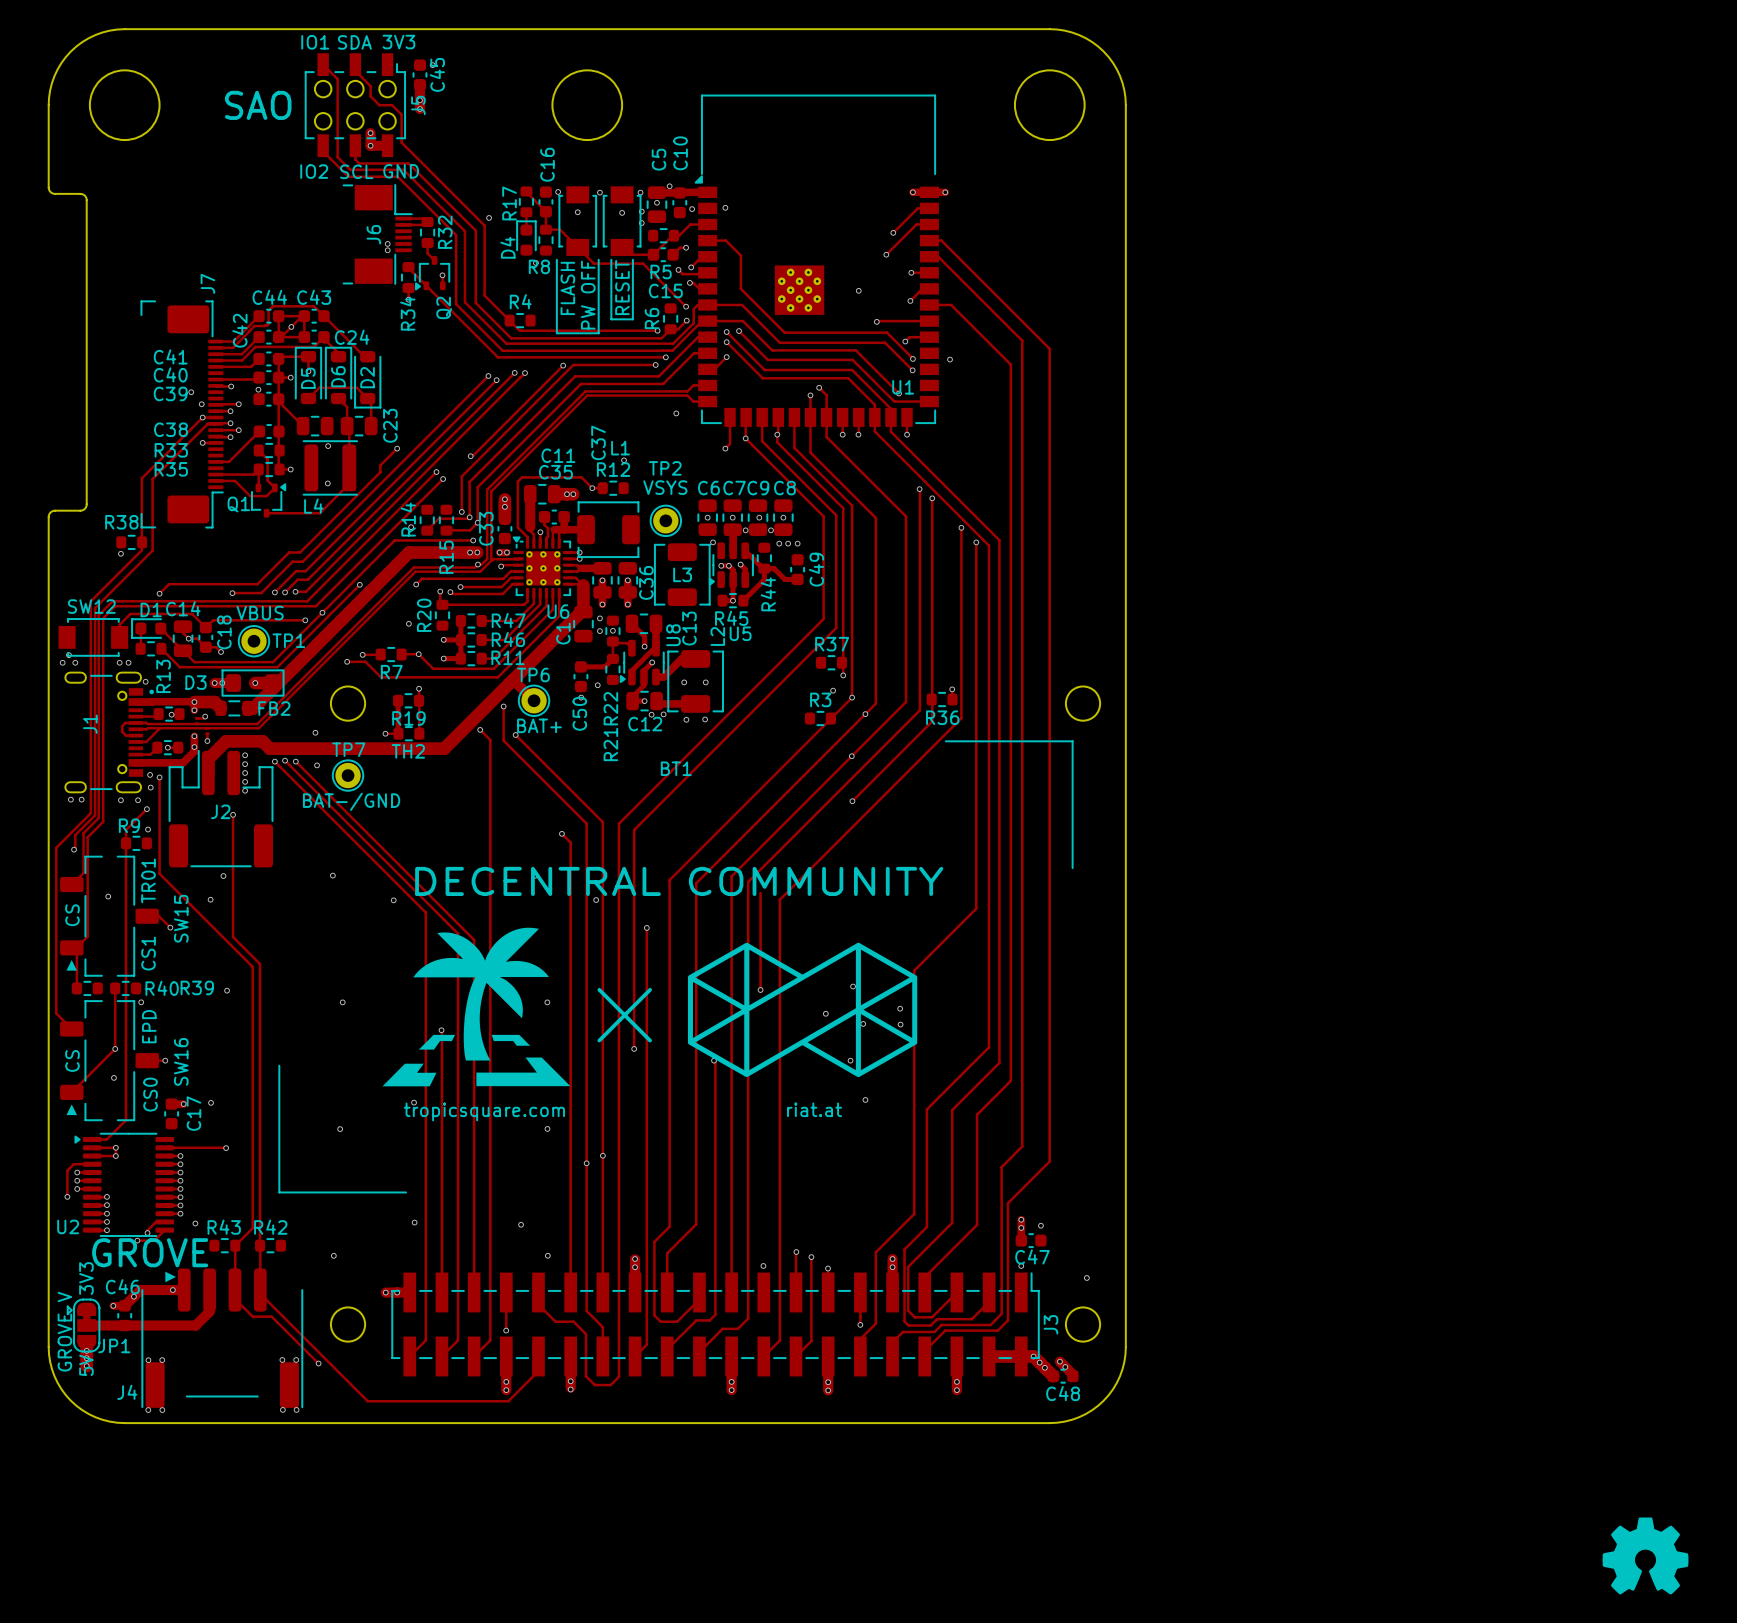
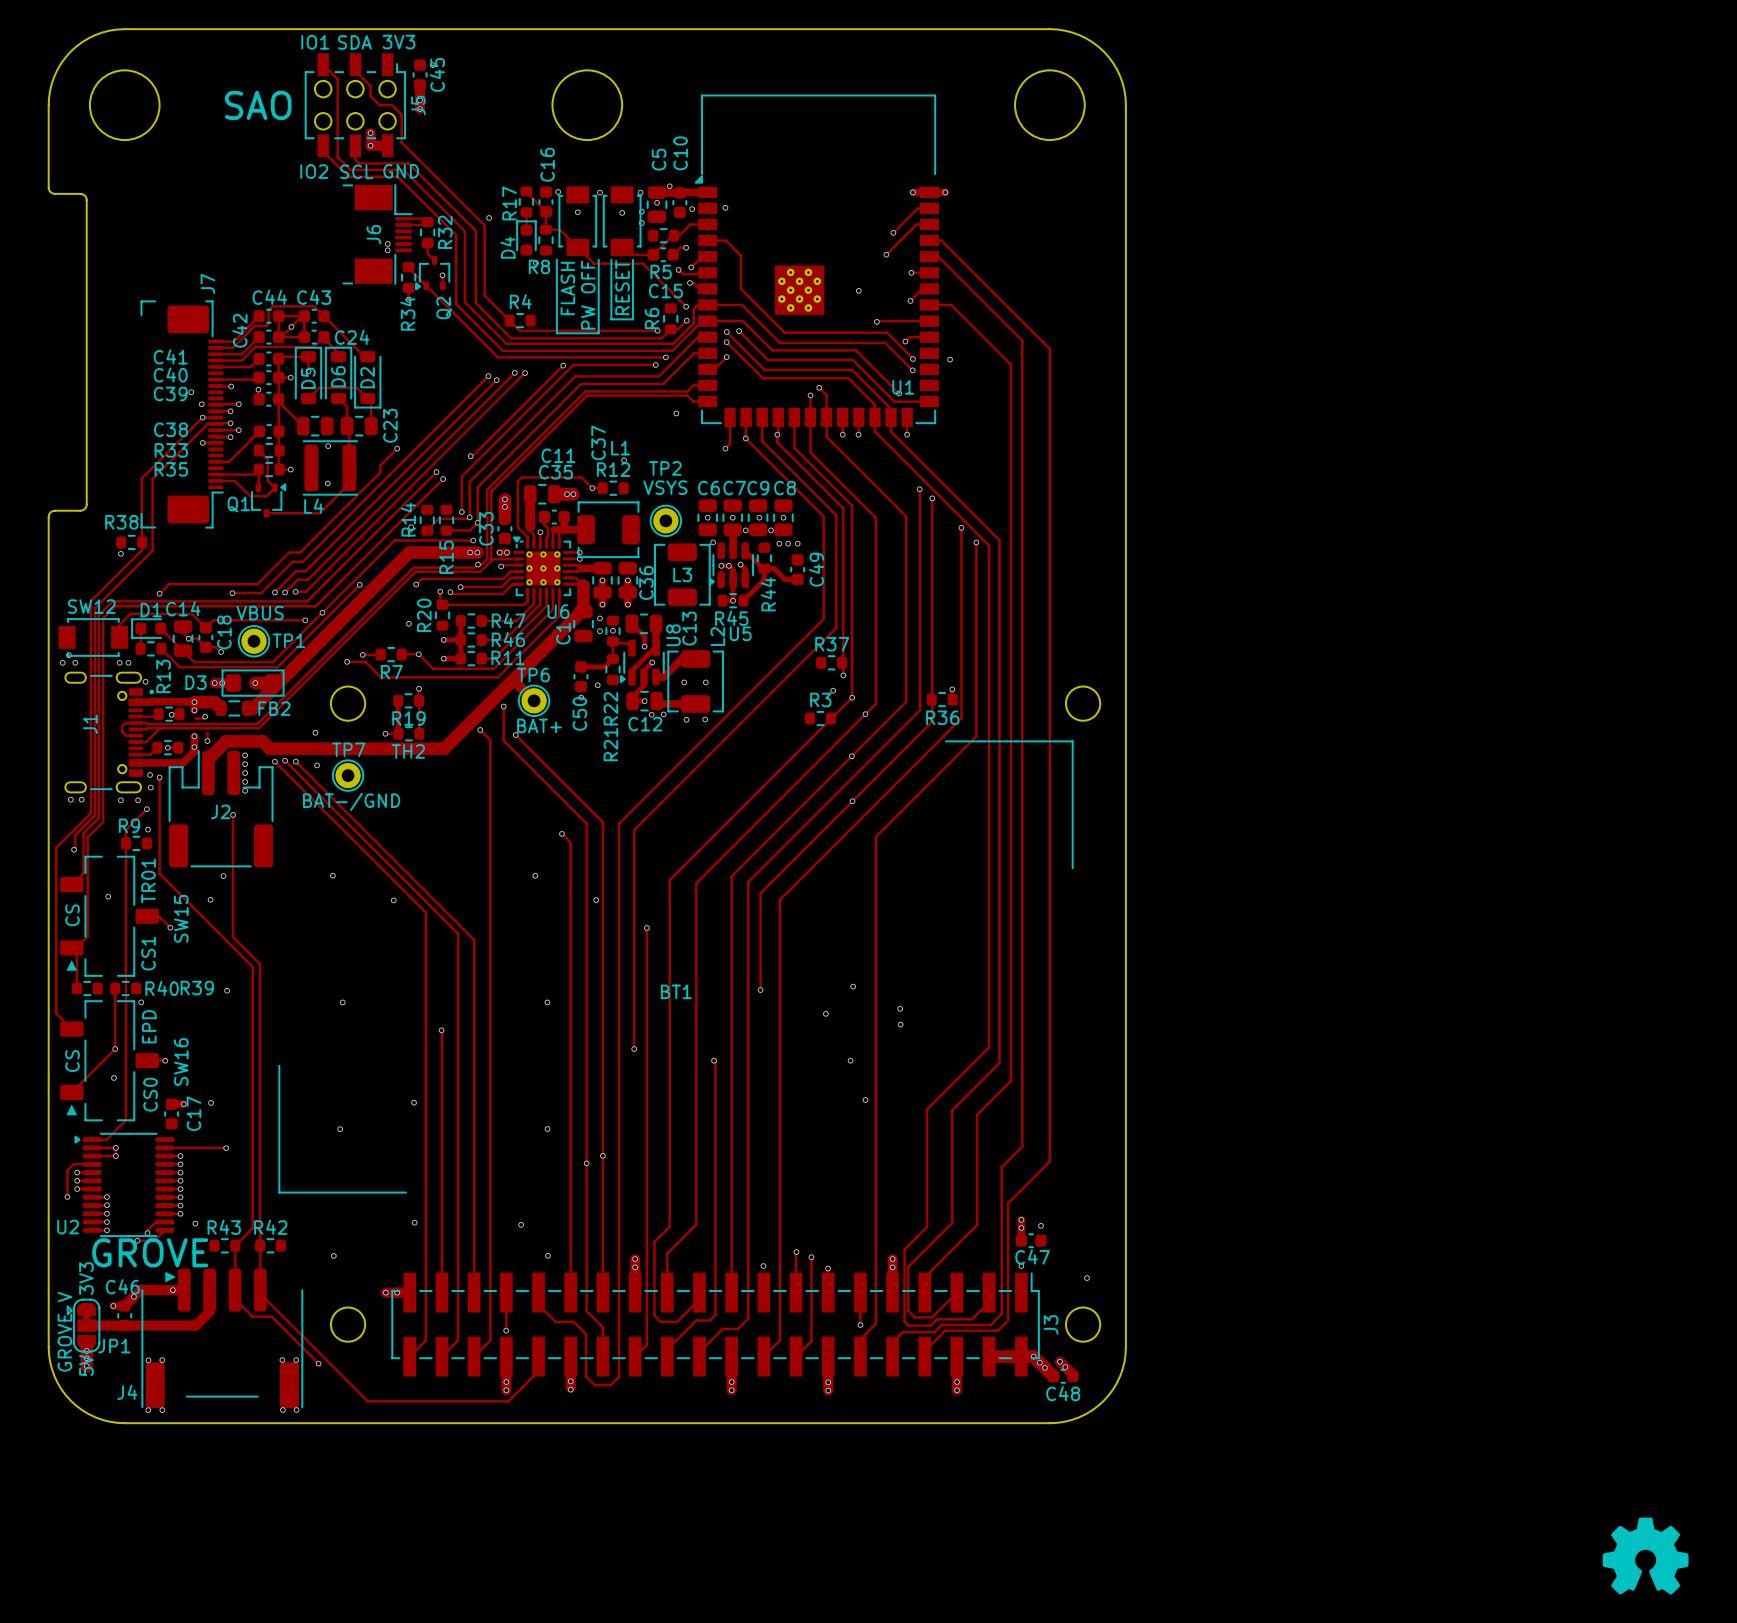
track: (976, 736) (976, 908) (914, 970) (914, 1214) (875, 1252) -> (976, 736) (875, 836) (875, 1252)
BT1 name position: BT1 (676, 768) -> BT1 (676, 991)
track: none -> (852, 801) (760, 893)
text: DECENTRAL COMMUNITY (679, 881) -> none
drawing: [382, 927, 571, 1087] -> none
drawing: [687, 942, 918, 1077] -> none
text: X (624, 1015) -> none
via: (863, 1023) -> none
text: riat.at (814, 1109) -> none
text: tropicsquare.com (484, 1111) -> none

